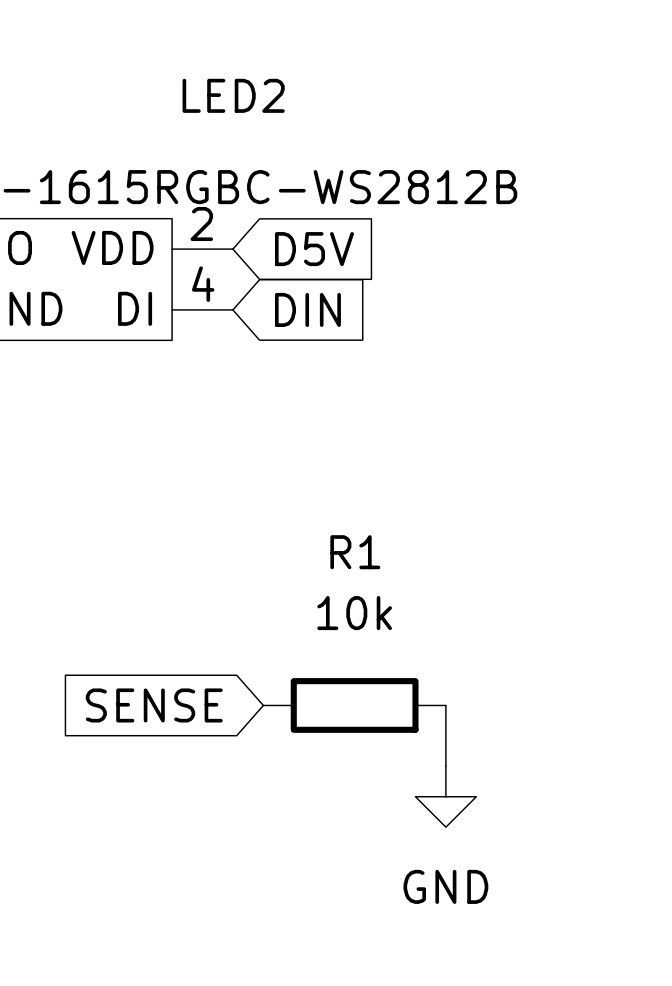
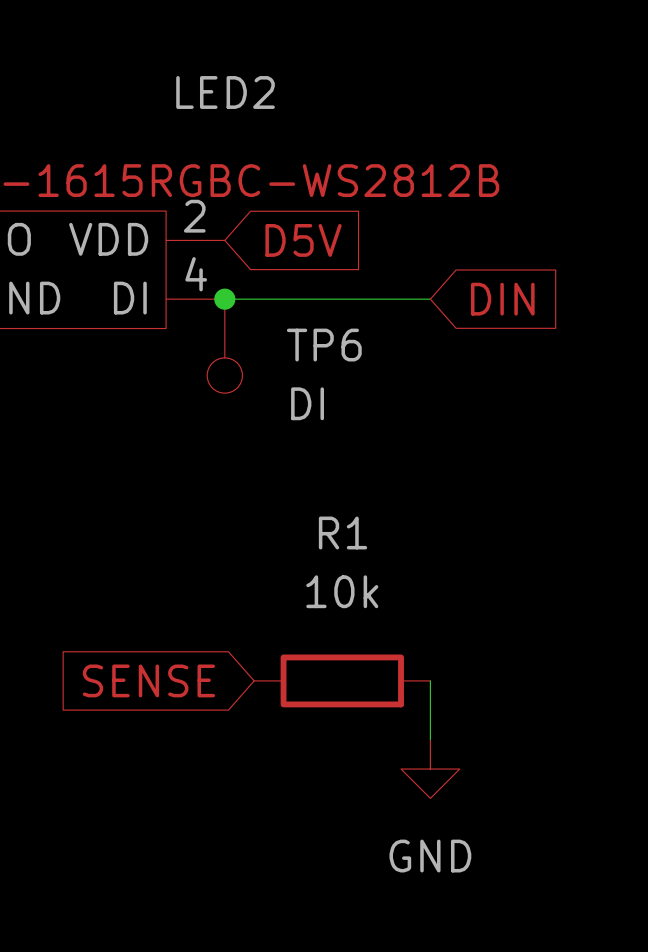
wire: none -> (224, 299) (430, 299)
junction: none -> (224, 299)
global label position: DIN (307, 309) -> DIN (502, 299)
TP6: none -> DI (224, 346)

